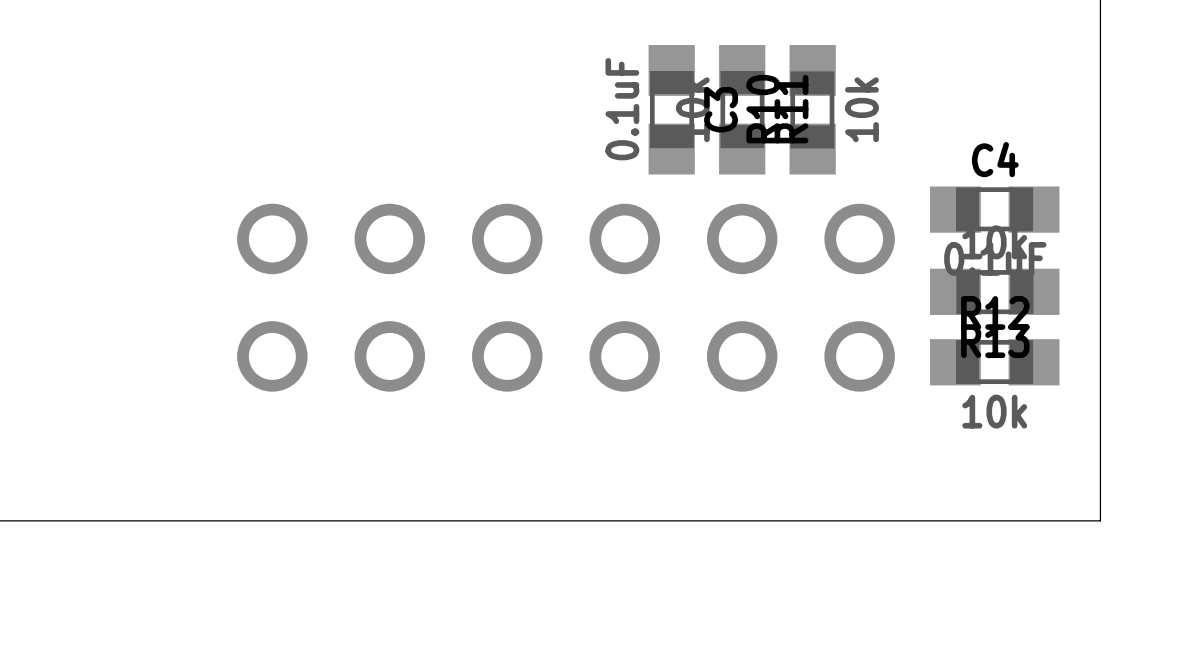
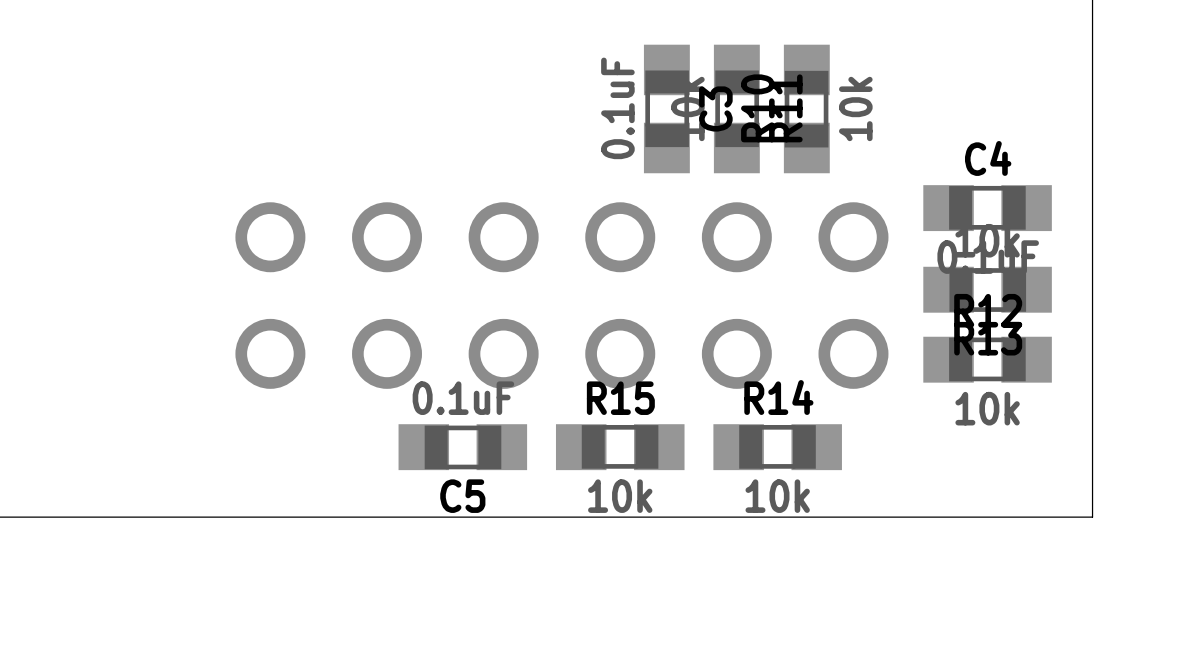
C5: none -> 0.1uF (462, 447)
R15: none -> 10k (620, 447)
R14: none -> 10k (777, 447)

